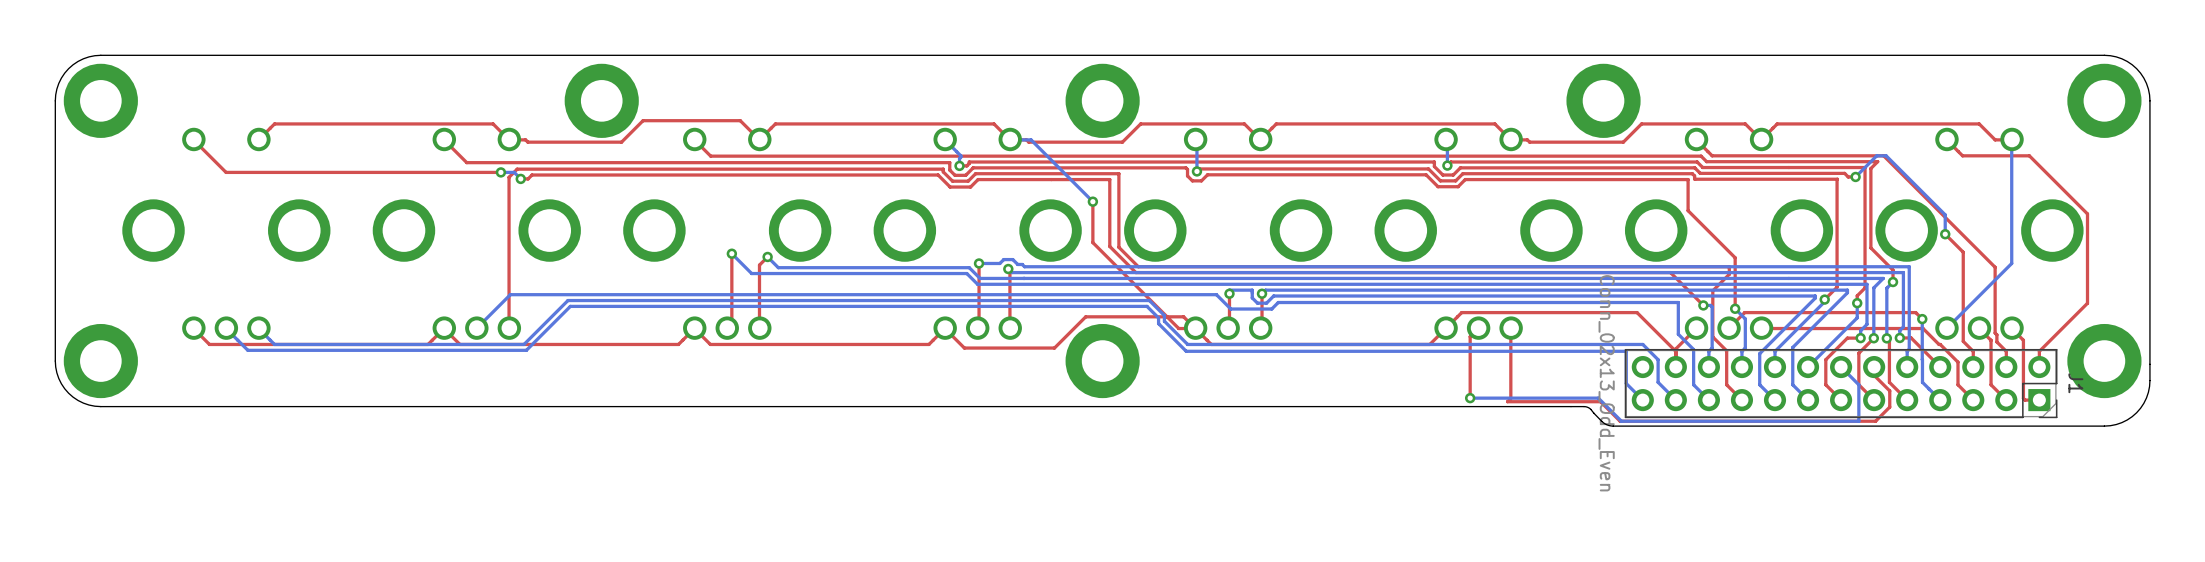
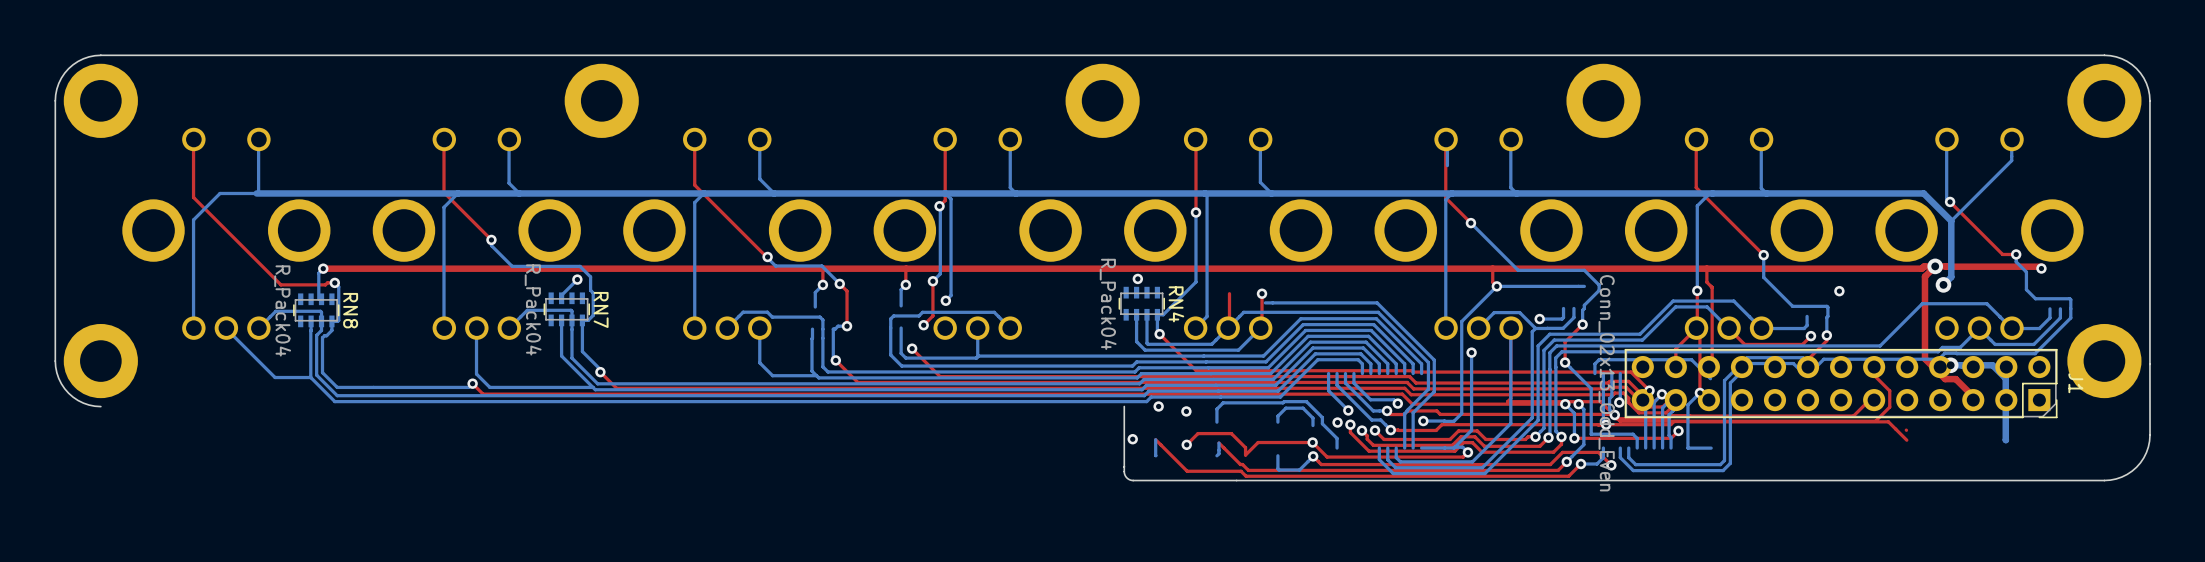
top track: (193, 139) (226, 172) (500, 172) -> (193, 139) (193, 197) (280, 284) (325, 284) (327, 282) (334, 282)
bottom track: none -> (258, 139) (258, 191) (256, 193)
top track: (443, 139) (466, 162) (949, 162) (949, 170) (954, 175) (965, 175) (973, 167) (1185, 167) (1187, 175) (1192, 180) (1201, 180) (1207, 174) (1426, 174) (1438, 186) (1458, 186) (1465, 179) (1688, 179) (1688, 210) (1735, 257) (1735, 308) -> (443, 139) (443, 192) (491, 239)
bottom track: none -> (509, 139) (509, 183) (519, 193)
top track: (694, 139) (710, 156) (1701, 156) (1706, 161) (1877, 161) (1870, 168) (1870, 247) (1893, 270) (1893, 282) -> (694, 139) (694, 185) (766, 256)
bottom track: none -> (759, 139) (759, 179) (774, 193)
bottom track: (944, 139) (960, 155) (959, 165) -> none
top track: none -> (945, 139) (945, 200) (939, 206)
bottom track: (1009, 139) (1031, 139) (1092, 201) -> (1010, 139) (1010, 187) (1016, 193)
bottom track: (1195, 139) (1196, 141) (1196, 171) -> none
top track: none -> (1195, 139) (1195, 212)
bottom track: none -> (1260, 139) (1260, 182) (1271, 193)
top track: none -> (1445, 139) (1445, 197) (1470, 223)
bottom track: none -> (1510, 139) (1510, 187) (1516, 193)
top track: (1696, 139) (1712, 155) (1883, 155) (1995, 267) (1995, 333) (1996, 341) (2006, 351) (2006, 367) -> (1696, 139) (1696, 187) (1763, 255)
bottom track: none -> (1761, 139) (1761, 188) (1766, 193)
bottom track: none -> (1946, 139) (1946, 198) (1950, 201)
top track: (1946, 139) (1962, 155) (2029, 155) (2087, 213) (2087, 303) (2039, 351) (2039, 367) -> none
top track: (2011, 139) (1995, 139) (1979, 123) (1777, 123) (1761, 139) (1745, 123) (1641, 123) (1623, 142) (1529, 142) (1527, 139) (1510, 139) (1494, 123) (1276, 123) (1260, 139) (1244, 123) (1140, 123) (1122, 142) (1028, 142) (1026, 139) (1009, 139) (994, 123) (775, 123) (759, 139) (740, 120) (643, 120) (621, 142) (527, 142) (525, 139) (509, 139) (493, 123) (274, 123) (258, 139) -> none
bottom track: (2011, 160) (2011, 263) (1946, 328) -> (2011, 160) (1951, 221)
top track: (959, 165) (966, 165) (969, 162) (1434, 162) (1434, 166) (1442, 175) (1453, 175) (1460, 167) (1694, 167) (1700, 173) (1844, 173) (1848, 176) (1855, 176) -> none
via: (959, 165) -> none
top track: (1447, 165) (1450, 162) (1697, 162) (1702, 167) (1865, 167) (1865, 287) (1857, 295) (1857, 303) -> none
via position: (1447, 165) -> (1470, 223)
top track: (1196, 171) (1199, 168) (1428, 168) (1440, 180) (1455, 180) (1462, 173) (1692, 173) (1694, 179) (1837, 179) (1837, 287) (1824, 299) -> none
via position: (1196, 171) -> (1195, 212)
bottom track: (500, 172) (514, 172) (520, 178) -> none
via: (500, 172) -> none
bottom track: (1855, 176) (1876, 155) (1886, 155) (1945, 214) (1945, 234) -> none
via: (1855, 176) -> none
top track: (520, 178) (528, 178) (532, 175) (938, 175) (950, 187) (970, 187) (978, 179) (1109, 179) (1109, 246) (1135, 272) (1670, 272) (1703, 305) -> none
via: (520, 178) -> none
bottom track: none -> (256, 193) (220, 193) (193, 219) (193, 328)
bottom track: none -> (256, 193) (1923, 193) (1951, 221)
bottom track: none -> (457, 193) (443, 207) (443, 328)
bottom track: none -> (703, 193) (694, 202) (694, 328)
bottom track: none -> (945, 193) (951, 199) (951, 295) (945, 300)
bottom track: none -> (1205, 193) (1207, 195) (1207, 316) (1195, 328)
bottom track: none -> (1451, 193) (1445, 199) (1445, 328)
bottom track: none -> (1712, 193) (1709, 193) (1697, 205) (1697, 290)
top track: (1092, 201) (1092, 242) (1178, 328) (1195, 328) -> none
via: (1092, 201) -> none
top track: none -> (1950, 201) (2002, 254) (2016, 254)
bottom track: none -> (939, 206) (940, 273) (932, 281)
via: none -> (939, 206)
bottom track: none -> (1195, 212) (1195, 282) (1163, 314) (1157, 314) (1157, 331) (1159, 334)
bottom track: none -> (1951, 221) (1951, 277) (1943, 284)
bottom track: none -> (1470, 223) (1518, 270) (1584, 270) (1599, 285) (1599, 290) (1584, 305) (1582, 324)
top track: (1945, 234) (1963, 252) (1963, 341) (1973, 351) (1973, 367) -> none
via position: (1945, 234) -> (1950, 201)
bottom track: none -> (491, 239) (491, 245) (512, 266) (580, 266) (590, 276) (590, 290) (593, 293) (593, 315) (588, 320) (582, 320) (582, 351) (600, 369) (600, 372)
via: none -> (491, 239)
bottom track: (731, 253) (751, 273) (966, 273) (977, 284) (1866, 284) (1866, 324) (1860, 330) (1860, 338) -> none
top track: (731, 253) (731, 323) (726, 328) -> none
via: (731, 253) -> none
bottom track: none -> (2016, 254) (2016, 261) (2026, 272) (2026, 289) (2035, 298) (2070, 299) (2070, 317) (2035, 353) (1944, 353) (1938, 359) (1823, 359) (1812, 370) (1800, 370) (1793, 363) (1749, 363) (1730, 383) (1730, 463) (1723, 470) (1633, 470) (1620, 457) (1620, 448)
via: none -> (2016, 254)
bottom track: none -> (1763, 255) (1763, 277) (1792, 306) (1827, 307) (1826, 335)
via: none -> (1763, 255)
bottom track: none -> (766, 256) (775, 266) (821, 266) (839, 283)
bottom track: (767, 256) (778, 267) (969, 267) (980, 278) (1883, 278) (1873, 287) (1873, 338) -> none
top track: (767, 256) (759, 265) (759, 328) -> none
bottom track: (979, 263) (999, 263) (1003, 259) (1012, 259) (1017, 264) (1024, 266) (1909, 266) (1909, 349) (1907, 351) (1907, 367) -> none
top track: (979, 263) (979, 326) (977, 328) -> none
via: (979, 263) -> none
top track: none -> (1935, 266) (1924, 276) (1924, 358) (1945, 379) (1955, 379) (1972, 396)
via: none -> (1935, 266)
top track: none -> (2041, 266) (1924, 266) (1921, 268) (323, 268)
bottom track: none -> (323, 268) (318, 273) (318, 299)
via: none -> (323, 268)
top track: none -> (823, 268) (822, 284)
top track: none -> (906, 268) (905, 284)
top track: none -> (1492, 268) (1492, 282) (1496, 286)
top track: none -> (1706, 268) (1706, 282) (1712, 287) (1710, 365)
via: none -> (2041, 268)
bottom track: (1008, 269) (1011, 272) (1903, 272) (1903, 327) (1899, 330) (1899, 337) -> none
top track: (1008, 269) (1009, 270) (1009, 328) (1011, 326) -> none
via: (1008, 269) -> none
via: none -> (1137, 278)
bottom track: none -> (577, 279) (561, 295) (561, 298)
via: none -> (577, 279)
top track: none -> (932, 281) (932, 315) (923, 325)
via: none -> (932, 281)
bottom track: none -> (334, 282) (338, 286) (338, 320) (331, 321) (331, 330) (322, 337) (322, 372) (337, 387) (468, 387) (472, 383)
via: none -> (334, 282)
bottom track: (1893, 282) (1886, 288) (1886, 338) -> none
via: (1893, 282) -> none
top track: none -> (839, 283) (847, 291) (847, 326)
via: none -> (839, 283)
bottom track: none -> (822, 284) (815, 292) (815, 307)
via: none -> (822, 284)
bottom track: none -> (905, 284) (901, 289) (901, 305)
via: none -> (905, 284)
via: none -> (1943, 284)
via: none -> (1496, 286)
bottom track: none -> (1584, 286) (1496, 286) (1461, 321) (1461, 413) (1453, 421) (1423, 421)
top track: none -> (1697, 290) (1696, 328) (1699, 332) (1699, 392)
via: none -> (1839, 291)
bottom track: (1229, 293) (1229, 290) (1252, 290) (1252, 297) (1257, 303) (1266, 303) (1273, 296) (1815, 296) (1759, 353) (1759, 384) (1775, 400) -> none
via: (1229, 293) -> none
bottom track: (1262, 293) (1265, 290) (1847, 290) (1847, 292) (1792, 347) (1792, 384) (1808, 400) -> none
bottom track: (1824, 299) (1775, 351) (1775, 367) -> none
via: (1824, 299) -> none
via: none -> (945, 300)
bottom track: none -> (1265, 302) (1377, 302) (1434, 360) (1434, 391) (1413, 412) (1413, 448)
RN4: none -> R_Pack04 (1141, 303)
bottom track: (1857, 303) (1857, 317) (1808, 367) -> none
via: (1857, 303) -> none
bottom track: (1703, 305) (1712, 306) (1712, 348) (1708, 351) (1708, 367) -> none
via position: (1703, 305) -> (1697, 290)
bottom track: none -> (1563, 308) (1562, 319) (1539, 319)
bottom track: none -> (1573, 308) (1573, 317) (1563, 328) (1547, 328)
bottom track: (1735, 308) (1745, 318) (1745, 348) (1741, 351) (1741, 367) -> none
via: (1735, 308) -> none
bottom track: none -> (2049, 308) (2049, 317) (2039, 328) (2011, 328) (1986, 303) (1922, 303) (1880, 345) (1556, 345) (1549, 352) (1549, 369)
bottom track: none -> (2060, 308) (2060, 317) (2033, 344) (1995, 344) (1979, 328) (1960, 347) (1942, 347) (1938, 351) (1561, 351) (1555, 358) (1555, 431) (1561, 436)
RN7: none -> R_Pack04 (566, 309)
RN8: none -> R_Pack04 (316, 310)
bottom track: none -> (1136, 314) (1136, 341) (1145, 350) (1238, 350) (1260, 328)
bottom track: none -> (1147, 314) (1147, 344) (1211, 344) (1243, 312) (1378, 312) (1428, 362) (1428, 389) (1404, 413) (1404, 448)
bottom track: none -> (1807, 316) (1807, 325) (1804, 328) (1761, 328) (1733, 301) (1673, 301) (1640, 334) (1549, 334) (1538, 345) (1538, 420) (1484, 473) (1393, 473) (1379, 459) (1379, 448)
via: none -> (1539, 319)
bottom track: (1922, 319) (1922, 382) (1940, 400) -> none
top track: (1922, 319) (1915, 312) (1744, 312) (1728, 328) -> (1810, 336) (1802, 344) (1744, 344) (1728, 328)
via: (1922, 319) -> none
bottom track: none -> (561, 320) (561, 356) (595, 389) (1141, 389) (1146, 385) (1215, 385)
bottom track: none -> (311, 321) (310, 377)
top track: none -> (1582, 324) (1565, 342) (1565, 362)
via: none -> (1582, 324)
via: none -> (923, 325)
bottom track: none -> (847, 326) (838, 326) (833, 329) (833, 357) (835, 360)
via: none -> (847, 326)
top track: (193, 328) (209, 344) (428, 344) (443, 328) (459, 344) (678, 344) (694, 328) (710, 344) (928, 344) (944, 328) (964, 348) (1054, 348) (1085, 316) (1183, 316) (1211, 344) (1429, 344) (1461, 312) (1637, 312) (1675, 351) -> none
bottom track: (258, 328) (274, 344) (524, 344) (567, 300) (1149, 300) (1164, 315) (1164, 321) (1187, 344) (1642, 344) (1658, 359) (1658, 382) (1675, 400) -> (258, 328) (275, 311) (320, 311) (321, 330) (316, 335) (316, 375) (337, 395) (1144, 395) (1148, 391) (1218, 391)
bottom track: (476, 328) (510, 294) (1216, 294) (1230, 309) (1271, 309) (1278, 302) (1678, 302) (1678, 334) (1693, 349) (1693, 384) (1708, 400) -> (476, 328) (476, 374) (489, 387) (592, 387)
bottom track: none -> (509, 328) (527, 310) (571, 310) (572, 358) (597, 383) (1139, 383) (1143, 379) (1213, 379)
top track: (509, 328) (509, 177) (517, 169) (943, 169) (943, 171) (952, 181) (968, 181) (975, 173) (1118, 173) (1118, 247) (1138, 266) (1729, 266) (1729, 274) (1712, 290) (1712, 336) (1726, 350) (1726, 384) (1741, 400) -> none
bottom track: none -> (727, 328) (743, 312) (767, 312) (772, 317) (819, 317) (822, 320) (822, 366) (828, 371) (1134, 371) (1139, 367) (1208, 367)
bottom track: none -> (759, 328) (759, 362) (772, 375) (816, 375)
bottom track: none -> (901, 328) (901, 353) (905, 358) (976, 358) (978, 356) (1203, 356)
bottom track: none -> (977, 328) (977, 356)
bottom track: none -> (1010, 328) (994, 312) (922, 312) (918, 315) (893, 315) (890, 318) (890, 355) (901, 366) (1132, 366) (1136, 361) (1206, 361)
top track: (1478, 328) (1470, 336) (1470, 398) -> none
bottom track: none -> (1510, 328) (1510, 423) (1472, 461) (1400, 461) (1396, 457) (1396, 448)
bottom track: none -> (1535, 328) (1519, 312) (1494, 312) (1478, 328)
bottom track: none -> (1535, 328) (1532, 331) (1532, 417) (1482, 467) (1395, 467) (1387, 459) (1387, 448)
bottom track: none -> (1547, 328) (1535, 328)
bottom track: none -> (1728, 328) (1707, 306) (1675, 306) (1642, 340) (1554, 340) (1543, 350) (1543, 428) (1535, 436)
top track: (1761, 328) (1923, 328) (1957, 362) (1957, 384) (1973, 400) -> none
top track: (1979, 328) (1991, 340) (1991, 384) (2006, 400) -> none
top track: (2011, 328) (2023, 340) (2023, 398) (2039, 400) -> none
bottom track: none -> (812, 329) (811, 371) (818, 377) (1137, 377) (1141, 373) (1211, 373)
top track: none -> (1159, 334) (1196, 370) (1631, 372) (1649, 390)
via: none -> (1159, 334)
top track: none -> (1826, 335) (1826, 340) (1806, 361)
via: none -> (1826, 335)
via: none -> (1810, 336)
top track: (1899, 337) (1911, 337) (1940, 367) -> none
via: (1899, 337) -> none
top track: (1860, 338) (1847, 338) (1825, 359) (1825, 384) (1841, 400) -> none
via: (1860, 338) -> none
top track: (1873, 338) (1858, 353) (1858, 384) (1874, 400) -> none
via: (1873, 338) -> none
top track: (1886, 338) (1889, 340) (1889, 382) (1907, 400) -> none
via: (1886, 338) -> none
top track: none -> (912, 348) (940, 376) (1409, 376) (1416, 383) (1628, 381) (1640, 393) (1640, 397) (1643, 401) (1655, 401) (1661, 394)
via: none -> (912, 348)
bottom track: (247, 350) (526, 350) (570, 306) (1147, 306) (1158, 317) (1158, 323) (1186, 351) (1626, 351) (1626, 383) (1642, 400) -> (247, 350) (275, 377) (310, 377)
bottom track: none -> (1471, 352) (1471, 430) (1453, 448) (1421, 448)
via: none -> (1471, 352)
bottom track: none -> (1203, 356) (1263, 356) (1300, 318) (1376, 318) (1421, 363) (1421, 373)
top track: none -> (835, 360) (857, 382) (1407, 382) (1413, 388) (1610, 388) (1626, 387) (1634, 395) (1634, 400) (1641, 407) (1662, 407) (1676, 392) (1680, 392)
via: none -> (835, 360)
part: (1102, 361) -> none
bottom track: none -> (1206, 361) (1265, 361) (1303, 324) (1373, 324) (1413, 363) (1413, 373)
bottom track: none -> (1806, 361) (1802, 357) (1747, 357) (1724, 380) (1724, 460) (1720, 464) (1635, 464) (1628, 457) (1628, 448)
bottom track: none -> (1565, 362) (1591, 388) (1591, 434) (1632, 434) (1637, 438) (1637, 448)
via: none -> (1565, 362)
board edge: (2149, 364) (2148, 392) (2140, 408) (2132, 416) (2121, 422) (2104, 426) (1613, 426) (1605, 423) (1589, 408) (1584, 406) (100, 406) -> (2149, 364) (2150, 435) (2146, 452) (2140, 462) (2132, 471) (2116, 478) (2104, 480) (1132, 480) (1126, 477) (1124, 472) (1124, 406)
bottom track: none -> (1950, 365) (1992, 365) (2005, 378) (2005, 440)
via: none -> (1950, 365)
bottom track: none -> (1208, 367) (1268, 367) (1305, 330) (1371, 330) (1404, 363) (1404, 373)
bottom track: (1841, 367) (1858, 384) (1858, 421) (1621, 421) (1598, 398) (1470, 398) -> none
bottom track: none -> (1550, 369) (1548, 437)
top track: none -> (600, 372) (616, 388) (1404, 388) (1411, 394) (1613, 394) (1623, 393) (1628, 398) (1628, 402) (1638, 412) (1666, 412) (1673, 405) (1677, 405)
via: none -> (600, 372)
bottom track: none -> (1328, 373) (1328, 390) (1348, 410)
bottom track: none -> (1337, 373) (1337, 385) (1371, 420) (1380, 420) (1390, 430)
bottom track: none -> (1345, 373) (1345, 383) (1373, 410) (1387, 410)
bottom track: none -> (1353, 373) (1353, 383) (1370, 399) (1394, 399) (1397, 403)
bottom track: none -> (1362, 373) (1362, 363) (1358, 359) (1317, 359) (1280, 397) (1220, 397)
bottom track: none -> (1370, 373) (1370, 363) (1360, 353) (1315, 353) (1278, 391) (1218, 391)
bottom track: none -> (1379, 373) (1379, 363) (1363, 348) (1312, 348) (1275, 385) (1215, 385)
bottom track: none -> (1387, 373) (1387, 363) (1365, 342) (1310, 342) (1273, 379) (1213, 379)
bottom track: none -> (1396, 373) (1396, 363) (1368, 336) (1308, 336) (1270, 373) (1211, 373)
bottom track: none -> (1594, 373) (1594, 363) (1599, 359) (1691, 359) (1710, 378)
bottom track: none -> (1603, 373) (1603, 422) (1606, 424)
bottom track: none -> (1611, 373) (1609, 409) (1614, 415)
bottom track: none -> (1620, 373) (1619, 402)
bottom track: none -> (310, 377) (334, 401) (1146, 401) (1151, 397) (1220, 397)
top track: none -> (472, 383) (483, 394) (1402, 394) (1412, 404) (1565, 404)
via: none -> (472, 383)
bottom track: none -> (1649, 390) (1645, 394) (1645, 448)
via: none -> (1649, 390)
bottom track: none -> (1680, 392) (1677, 392) (1662, 407) (1662, 448)
bottom track: none -> (1699, 392) (1687, 404) (1687, 448)
via: none -> (1699, 392)
bottom track: none -> (1661, 394) (1654, 402) (1654, 448)
via: none -> (1661, 394)
top track: none -> (1873, 396) (1853, 415) (1671, 415) (1668, 418) (1616, 418) (1612, 414) (1440, 414) (1436, 410) (1407, 410) (1404, 414) (1390, 414) (1387, 410)
via: (1470, 398) -> none
via: none -> (1619, 402)
via: none -> (1397, 403)
bottom track: none -> (1565, 404) (1574, 413) (1574, 438)
via: none -> (1565, 404)
bottom track: none -> (1578, 404) (1583, 409) (1583, 444) (1566, 461)
via: none -> (1578, 404)
bottom track: none -> (1677, 405) (1669, 414) (1671, 448)
via: none -> (1158, 406)
via: none -> (1348, 410)
via: none -> (1387, 410)
via: none -> (1186, 411)
via: none -> (1614, 415)
via: none -> (1423, 421)
bottom track: none -> (1216, 422) (1216, 409) (1223, 402) (1306, 401) (1322, 417) (1322, 423) (1337, 438) (1337, 448)
bottom track: none -> (1277, 422) (1277, 416) (1285, 408) (1303, 408) (1312, 418) (1312, 425)
via: none -> (1337, 422)
top track: none -> (1350, 424) (1350, 432) (1369, 451) (1454, 451) (1463, 442) (1472, 442) (1482, 452) (1553, 452) (1561, 444) (1561, 436)
via: none -> (1350, 424)
via: none -> (1606, 424)
top track: none -> (1361, 430) (1373, 445) (1452, 445) (1461, 436) (1474, 436) (1484, 446) (1539, 446) (1548, 437)
via: none -> (1361, 430)
top track: none -> (1375, 430) (1384, 439) (1450, 439) (1458, 430) (1477, 430) (1485, 439) (1525, 439) (1528, 436) (1535, 436)
via: none -> (1375, 430)
top track: none -> (1390, 430) (1436, 430) (1441, 424) (1670, 424) (1674, 421) (1888, 421) (1906, 440)
via: none -> (1390, 430)
top track: none -> (1678, 430) (1671, 438) (1574, 438)
via: none -> (1678, 430)
via: none -> (1535, 436)
via: none -> (1561, 436)
via: none -> (1548, 437)
via: none -> (1574, 438)
via: none -> (1132, 439)
bottom track: none -> (1155, 439) (1155, 455)
top track: none -> (1155, 439) (1187, 471) (1241, 471) (1246, 476) (1568, 476) (1580, 463)
via: none -> (1312, 442)
bottom track: none -> (1218, 443) (1218, 453) (1216, 455)
top track: none -> (1218, 443) (1248, 470) (1558, 470) (1566, 461)
top track: none -> (1186, 444) (1197, 433) (1231, 433) (1245, 447) (1245, 455) (1258, 442) (1312, 442) (1327, 457) (1463, 457) (1467, 452)
via: none -> (1186, 444)
bottom track: none -> (1454, 447) (1462, 447) (1467, 452)
bottom track: none -> (1603, 448) (1603, 457) (1597, 463) (1580, 463)
bottom track: none -> (1711, 448) (1688, 448)
via: none -> (1467, 452)
bottom track: none -> (1277, 455) (1279, 470) (1299, 470) (1313, 456)
top track: none -> (1313, 456) (1321, 464) (1550, 464) (1562, 452) (1598, 452) (1611, 465)
via: none -> (1313, 456)
via: none -> (1566, 461)
via: none -> (1580, 463)
via: none -> (1611, 465)

